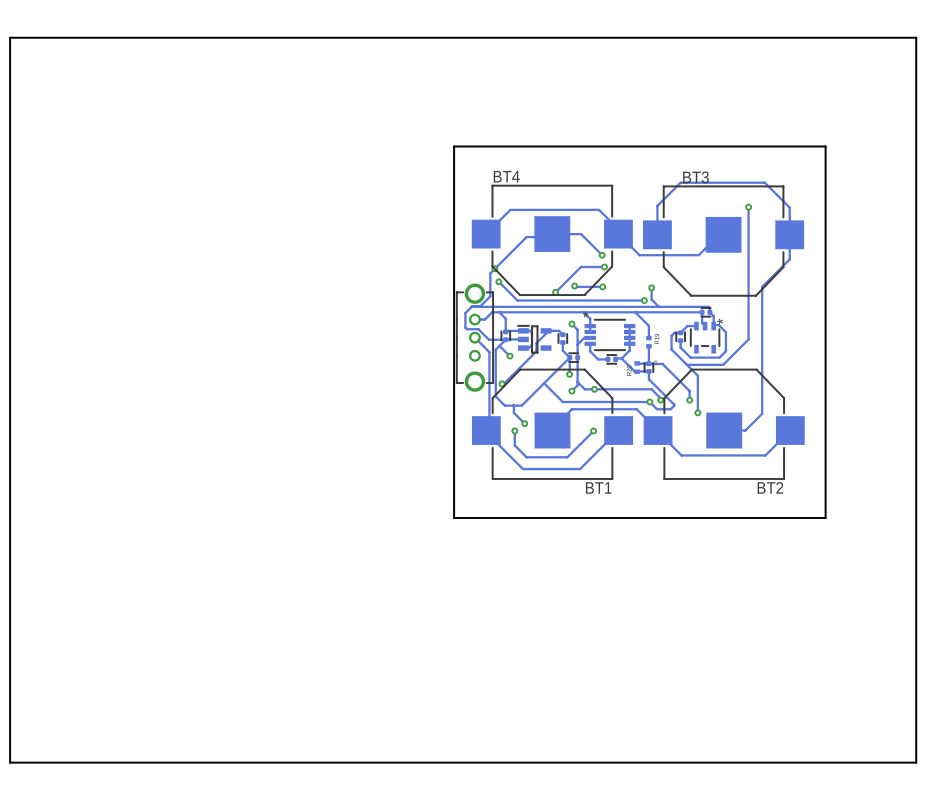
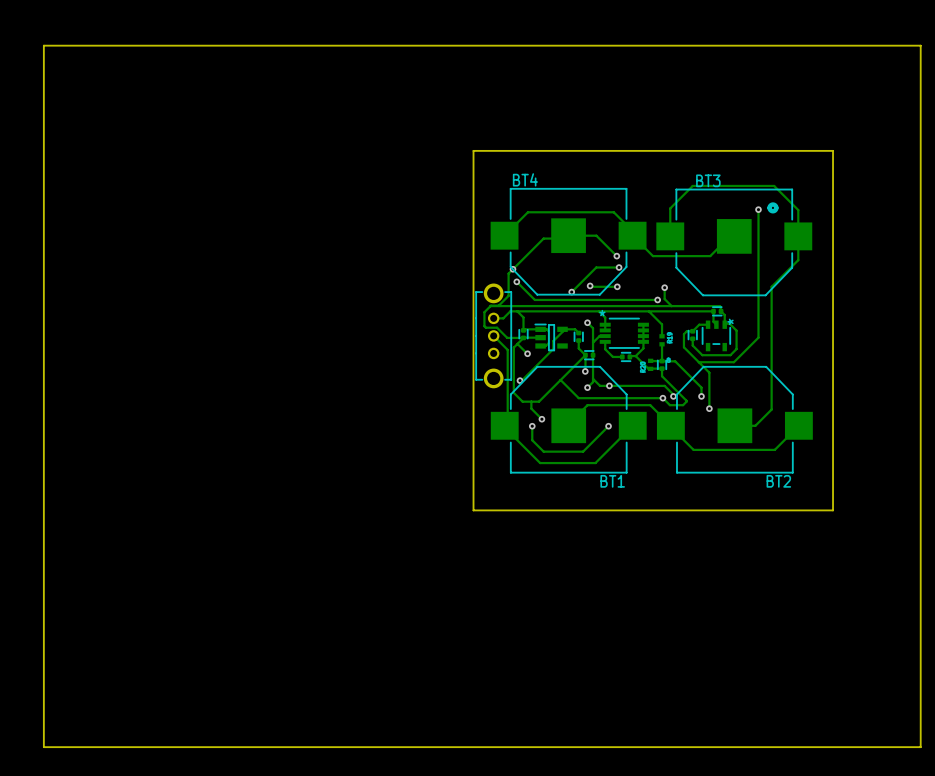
part: none -> (772, 207)

